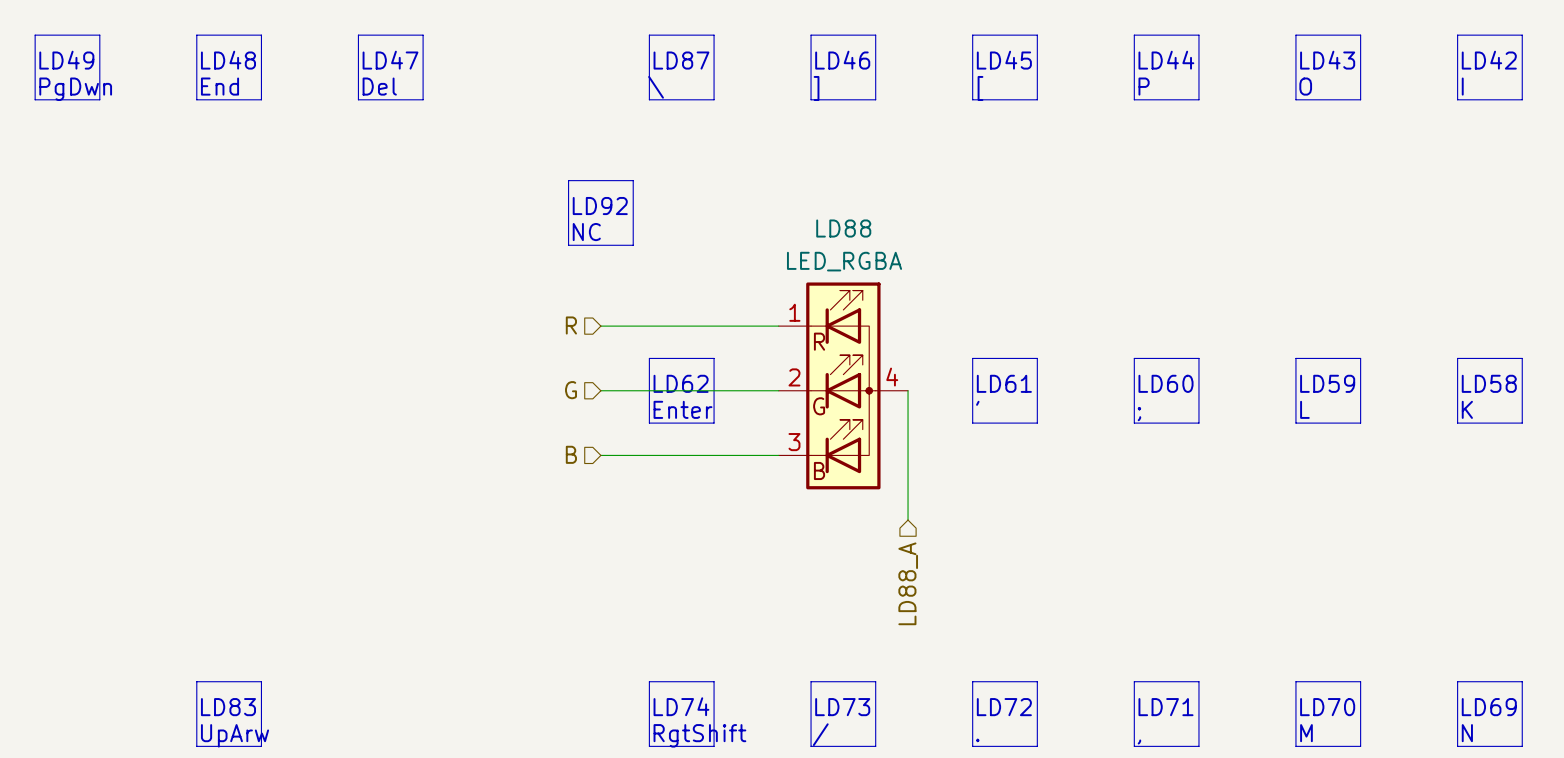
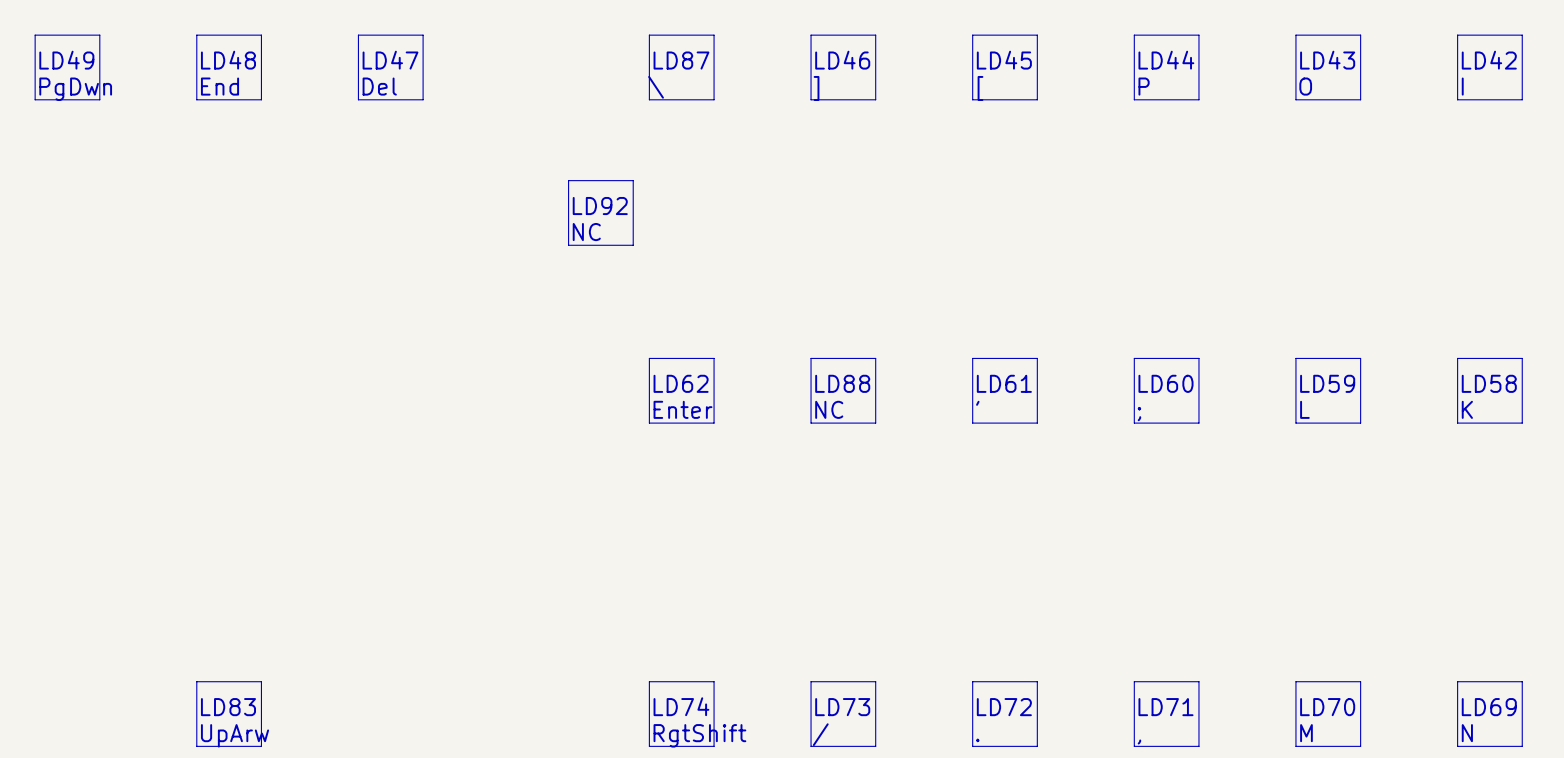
hierarchical label: R (571, 325) -> none
wire: (600, 326) (778, 326) -> none
line: none -> (811, 358) (875, 358) (875, 423) (811, 423) (811, 358)
text: none -> LD88 (842, 383)
LD88: LED_RGBA (843, 385) -> none
hierarchical label: G (571, 390) -> none
wire: (600, 390) (778, 390) -> none
wire: (908, 390) (908, 520) -> none
text: none -> NC (829, 409)
hierarchical label: B (571, 454) -> none
wire: (600, 455) (778, 455) -> none
hierarchical label: LD88_A (908, 583) -> none

